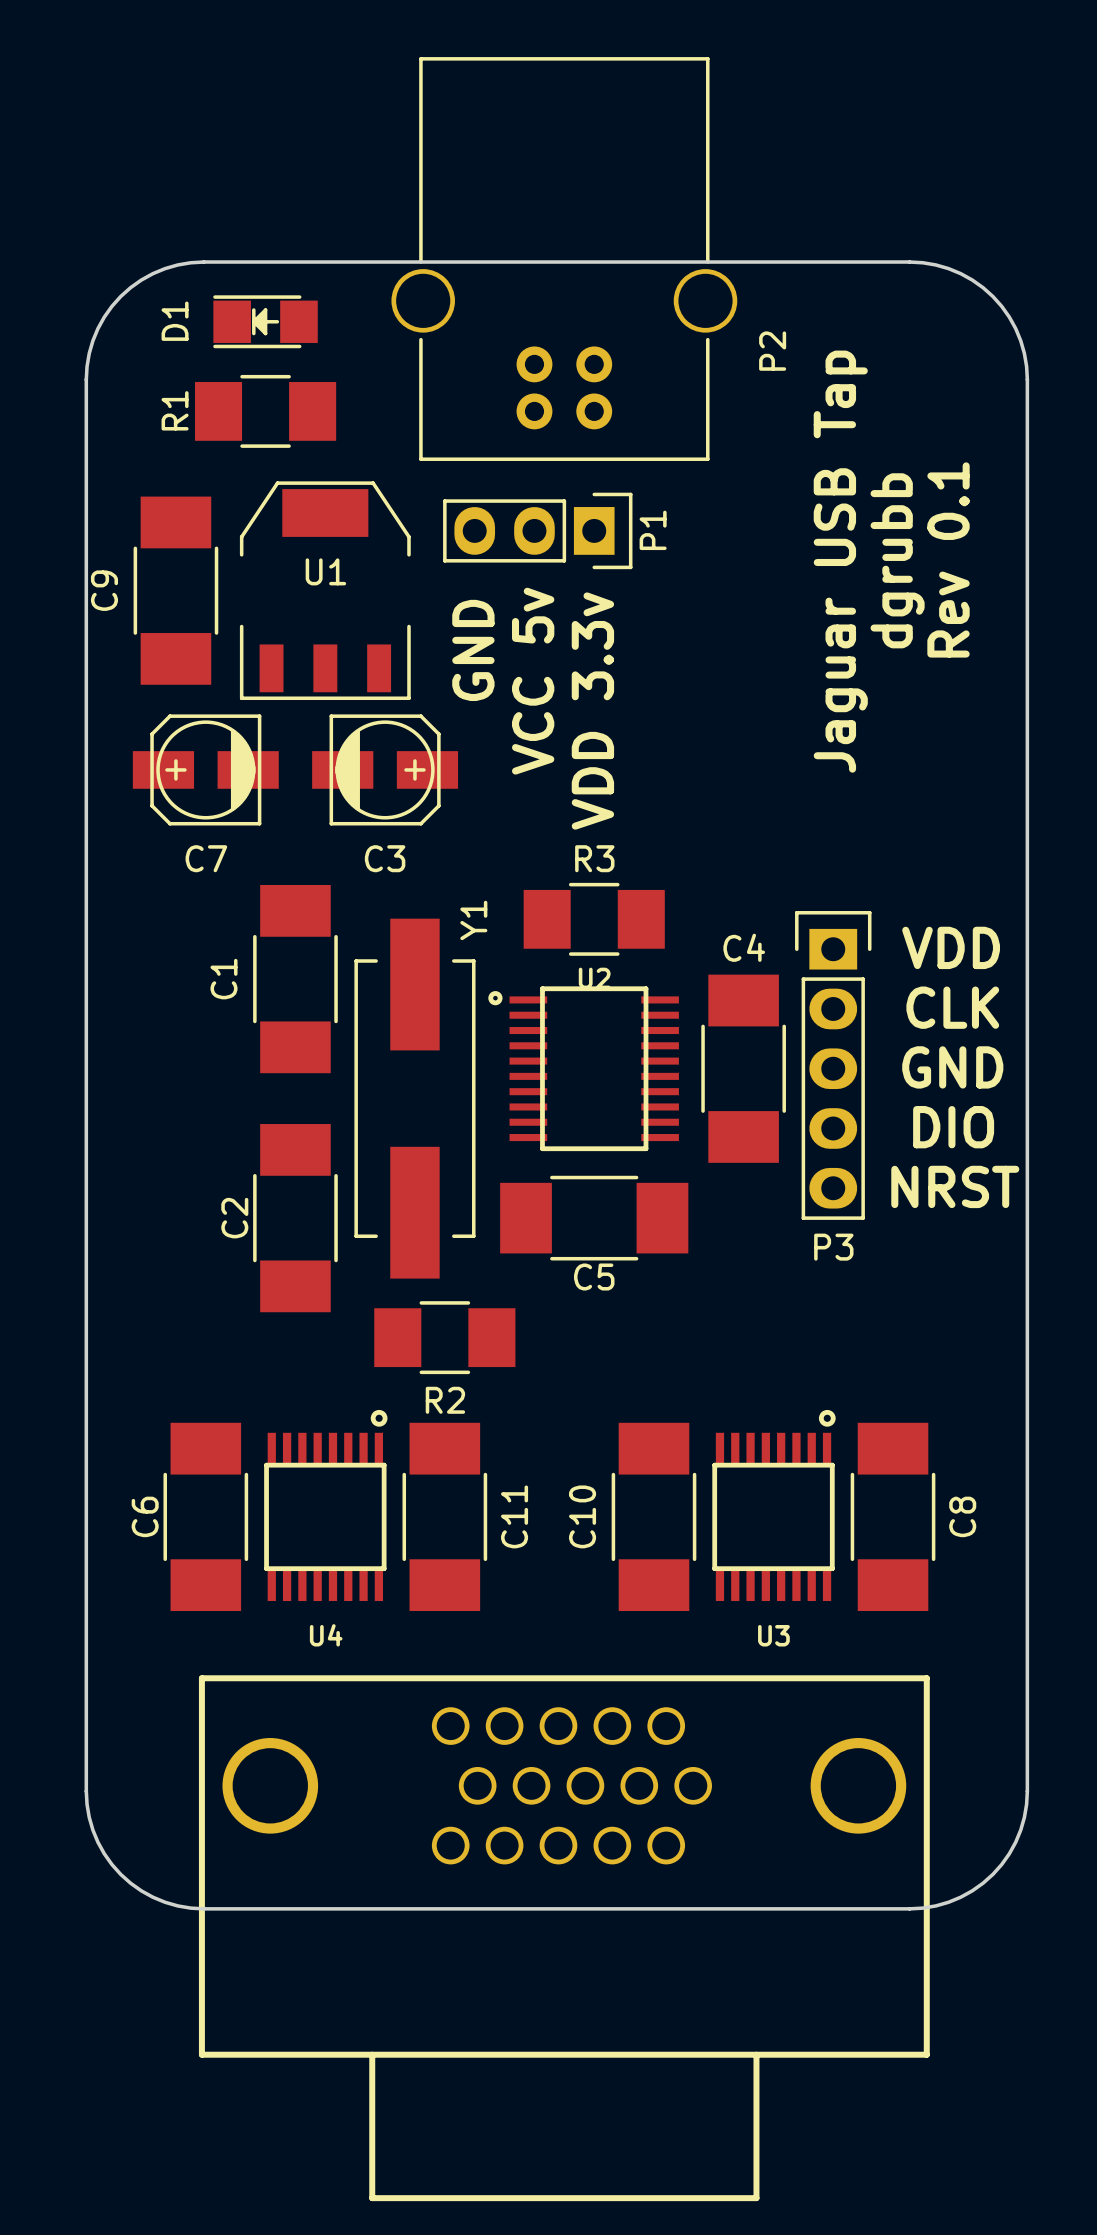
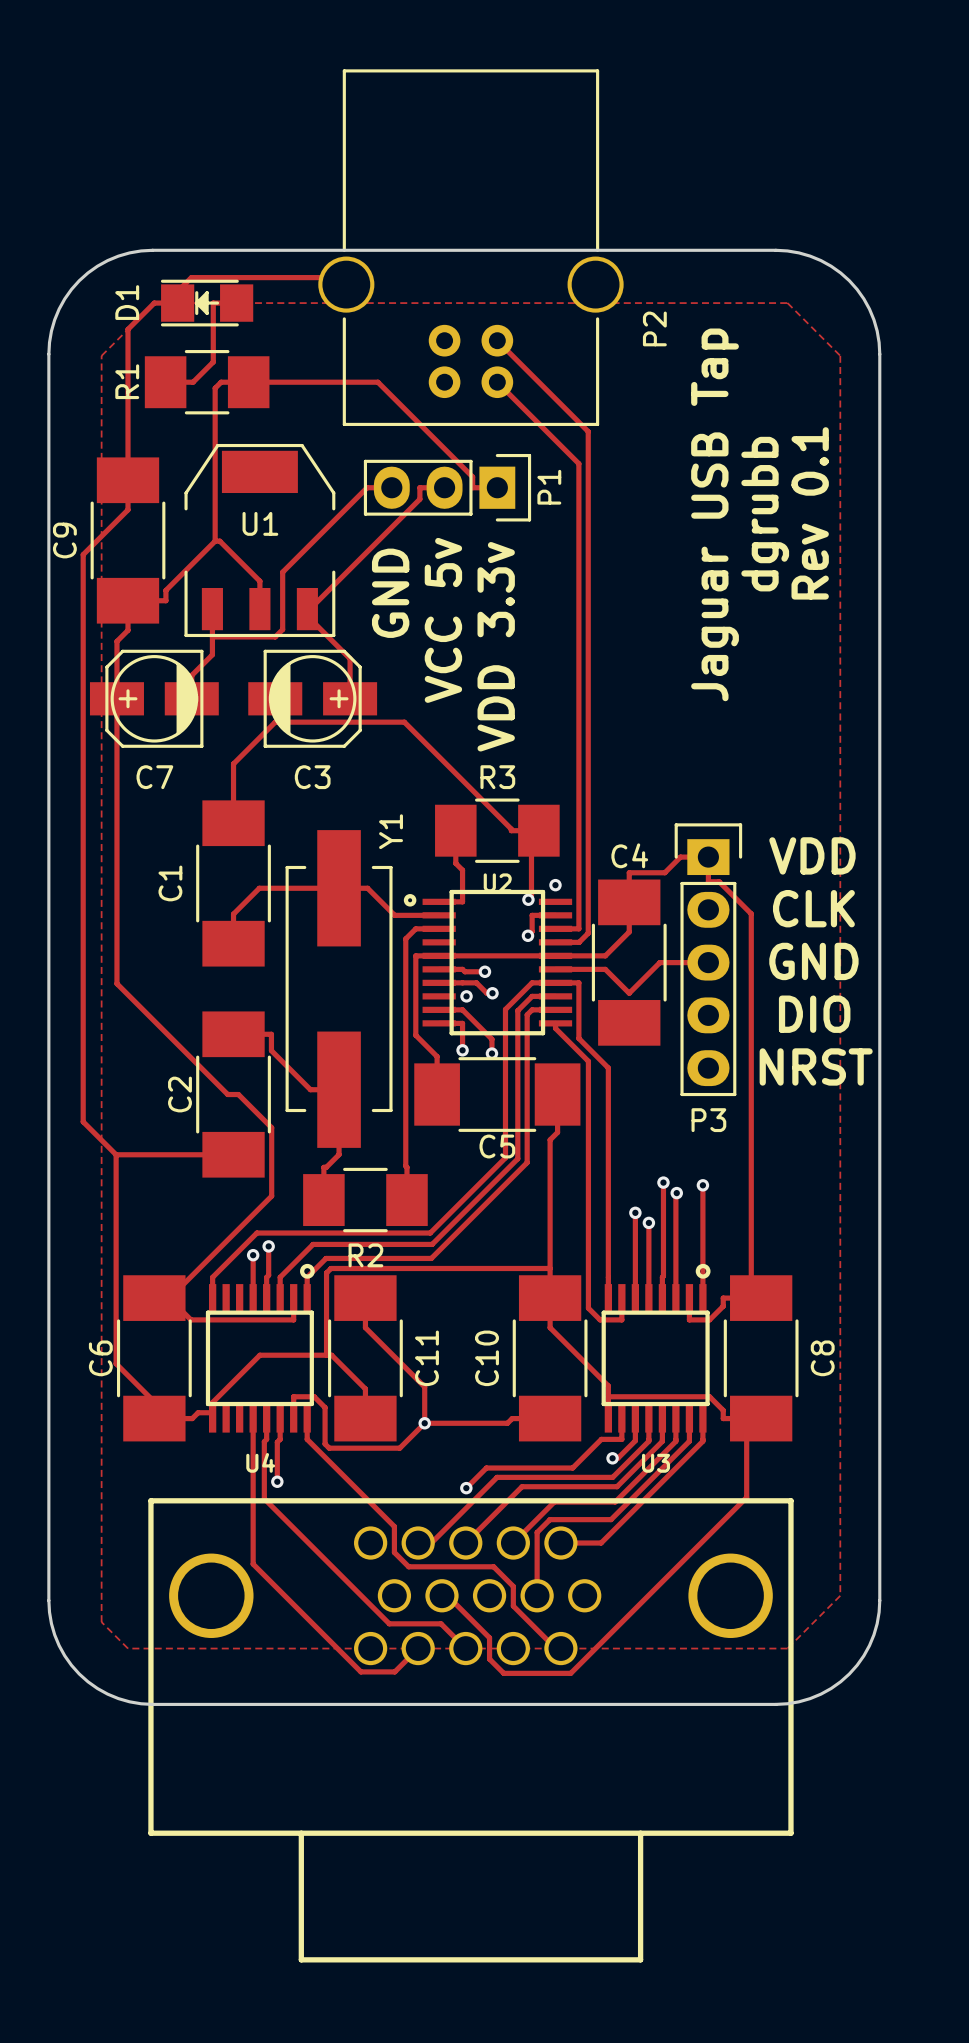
track: none -> (346, 284) (339, 277) (191, 277) (165, 303)
zone outline: none -> (154, 303) (101, 355) (101, 1622) (128, 1648) (787, 1648) (840, 1595) (840, 355) (787, 303) (154, 303)
track: none -> (177, 303) (154, 303) (128, 329) (128, 509) (83, 554) (83, 1121) (116, 1154)
track: none -> (236, 303) (213, 303) (213, 362) (193, 382) (165, 382)
track: none -> (497, 340) (588, 431) (588, 933) (579, 942) (555, 942)
track: none -> (497, 382) (578, 463) (578, 928) (555, 928)
track: none -> (391, 487) (367, 487) (282, 572) (282, 629) (275, 636) (212, 636)
track: none -> (444, 487) (419, 487) (419, 499) (308, 610)
track: none -> (497, 487) (472, 487) (472, 476) (377, 382) (221, 382) (215, 388) (215, 541)
track: none -> (215, 541) (219, 541) (259, 581) (259, 609)
track: none -> (215, 541) (165, 590) (165, 600) (128, 600) (128, 630) (116, 641) (116, 983) (227, 1094) (238, 1094) (271, 1127) (271, 1196) (169, 1298) (154, 1298)
track: none -> (212, 609) (212, 654) (191, 675) (191, 698)
track: none -> (308, 610) (314, 616) (314, 623) (350, 658) (350, 698)
track: none -> (233, 823) (233, 763) (275, 722) (404, 722) (511, 830) (538, 830)
track: none -> (455, 830) (455, 863) (462, 870) (462, 901) (439, 901)
track: none -> (531, 830) (531, 896) (528, 899)
via: none -> (555, 885)
via: none -> (528, 899)
track: none -> (439, 915) (394, 915) (367, 888) (259, 888) (233, 914) (233, 943)
track: none -> (555, 915) (532, 915) (532, 931) (527, 935)
track: none -> (439, 928) (415, 928) (405, 938) (406, 1200)
via: none -> (527, 935)
track: none -> (708, 962) (659, 962) (629, 993) (605, 969) (555, 969)
track: none -> (439, 969) (484, 971)
via: none -> (484, 971)
track: none -> (439, 982) (476, 982) (486, 993) (492, 993)
via: none -> (492, 993)
via: none -> (466, 996)
track: none -> (555, 996) (532, 996) (517, 1010) (517, 1158) (432, 1244) (313, 1244) (280, 1277) (280, 1298)
track: none -> (439, 1009) (462, 1009) (491, 1039) (491, 1053)
track: none -> (555, 1009) (532, 1009) (527, 1014) (527, 1162) (431, 1258) (326, 1258) (307, 1277) (307, 1298)
track: none -> (439, 1023) (462, 1023) (462, 1050)
track: none -> (555, 1023) (555, 1028) (588, 1061) (588, 1308) (600, 1319) (621, 1319) (621, 1298)
track: none -> (233, 1034) (271, 1034) (271, 1050) (310, 1089) (339, 1089) (339, 1154) (326, 1167) (323, 1167) (323, 1200)
via: none -> (462, 1050)
via: none -> (491, 1053)
track: none -> (437, 1094) (437, 1056) (415, 1035) (415, 955) (605, 955) (629, 931) (629, 872) (664, 872) (680, 857) (708, 857) (708, 881) (719, 881) (751, 913) (751, 1298)
track: none -> (557, 1094) (557, 1132) (550, 1139) (550, 1327) (608, 1385) (608, 1418)
track: none -> (116, 1154) (233, 1154)
track: none -> (116, 1154) (116, 1363) (171, 1418)
track: none -> (663, 1182) (662, 1298)
via: none -> (663, 1182)
track: none -> (702, 1185) (702, 1298)
via: none -> (702, 1185)
track: none -> (676, 1193) (675, 1298)
via: none -> (676, 1193)
track: none -> (635, 1212) (635, 1298)
via: none -> (635, 1212)
track: none -> (648, 1222) (648, 1298)
via: none -> (648, 1222)
track: none -> (268, 1246) (266, 1298)
via: none -> (268, 1246)
track: none -> (253, 1255) (253, 1298)
via: none -> (253, 1255)
track: none -> (550, 1268) (330, 1268) (326, 1272) (326, 1355)
track: none -> (169, 1298) (190, 1319) (293, 1319) (293, 1298)
track: none -> (365, 1298) (365, 1327) (424, 1386) (424, 1423)
track: none -> (761, 1298) (723, 1298) (723, 1306) (709, 1319) (689, 1319) (689, 1298)
track: none -> (212, 1298) (212, 1277) (256, 1233) (430, 1233) (505, 1157) (505, 1009) (532, 982) (578, 982) (578, 1038) (608, 1067) (608, 1298)
track: none -> (608, 1396) (709, 1396) (723, 1410) (723, 1418) (761, 1418)
track: none -> (212, 1412) (198, 1412) (192, 1418) (154, 1418)
track: none -> (212, 1418) (212, 1402) (259, 1355) (331, 1355) (365, 1388) (365, 1418)
track: none -> (253, 1418) (253, 1564) (360, 1671) (394, 1671) (418, 1648)
track: none -> (266, 1418) (266, 1439) (264, 1441) (264, 1498) (389, 1623) (441, 1623) (465, 1648)
track: none -> (280, 1418) (280, 1439) (277, 1442) (277, 1481)
track: none -> (293, 1418) (293, 1396) (314, 1396) (325, 1407) (325, 1444) (329, 1448) (399, 1448) (424, 1423)
track: none -> (307, 1418) (307, 1439) (394, 1526) (394, 1552) (408, 1566) (493, 1566) (513, 1586) (513, 1606) (555, 1648) (560, 1648)
track: none -> (621, 1418) (621, 1439) (601, 1439) (572, 1468) (486, 1468) (466, 1488)
track: none -> (635, 1418) (635, 1440) (617, 1458) (612, 1458)
track: none -> (648, 1418) (648, 1441) (612, 1477) (497, 1477) (431, 1543) (418, 1543)
track: none -> (662, 1418) (662, 1441) (617, 1486) (522, 1486) (465, 1543)
track: none -> (675, 1418) (675, 1441) (615, 1502) (554, 1502) (513, 1543)
track: none -> (689, 1418) (689, 1441) (611, 1519) (549, 1519) (537, 1532) (537, 1595)
track: none -> (702, 1418) (702, 1441) (601, 1543) (560, 1543)
track: none -> (550, 1418) (512, 1418) (507, 1423) (424, 1423)
track: none -> (746, 1418) (746, 1497) (570, 1673) (503, 1673) (489, 1659) (489, 1637) (447, 1595) (441, 1595)
via: none -> (424, 1423)
via: none -> (612, 1458)
via: none -> (277, 1481)
via: none -> (466, 1488)

